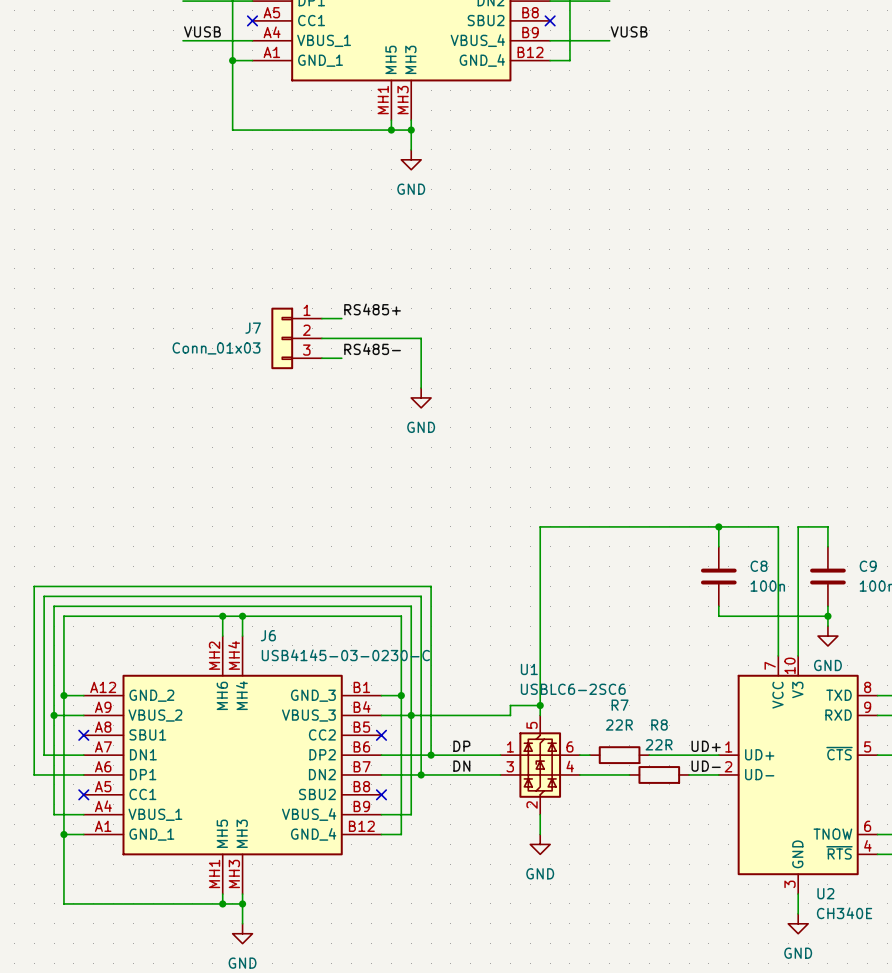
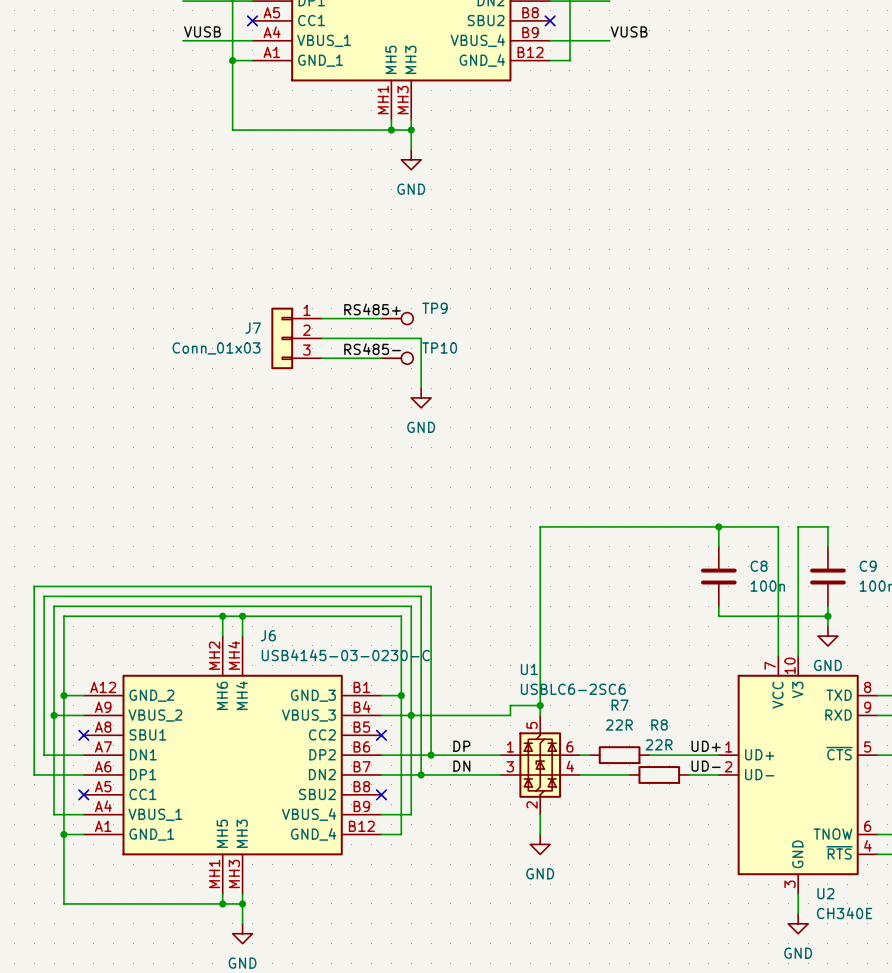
wire: none -> (341, 318) (381, 318)
TP9: none -> (397, 318)
wire: none -> (341, 358) (381, 358)
TP10: none -> (397, 358)

